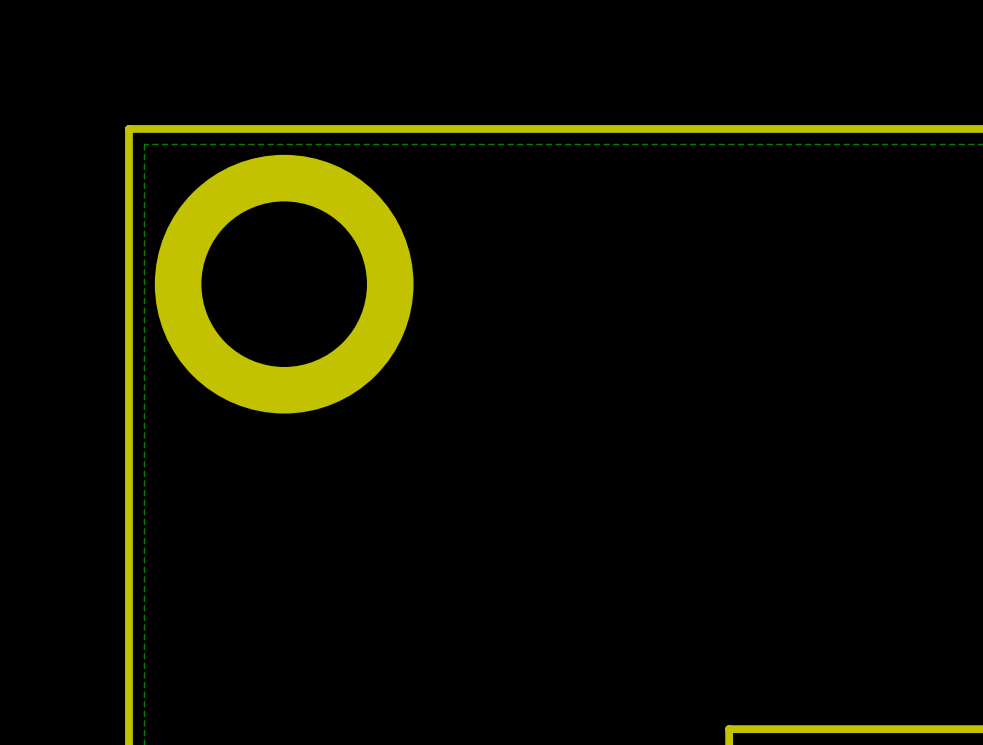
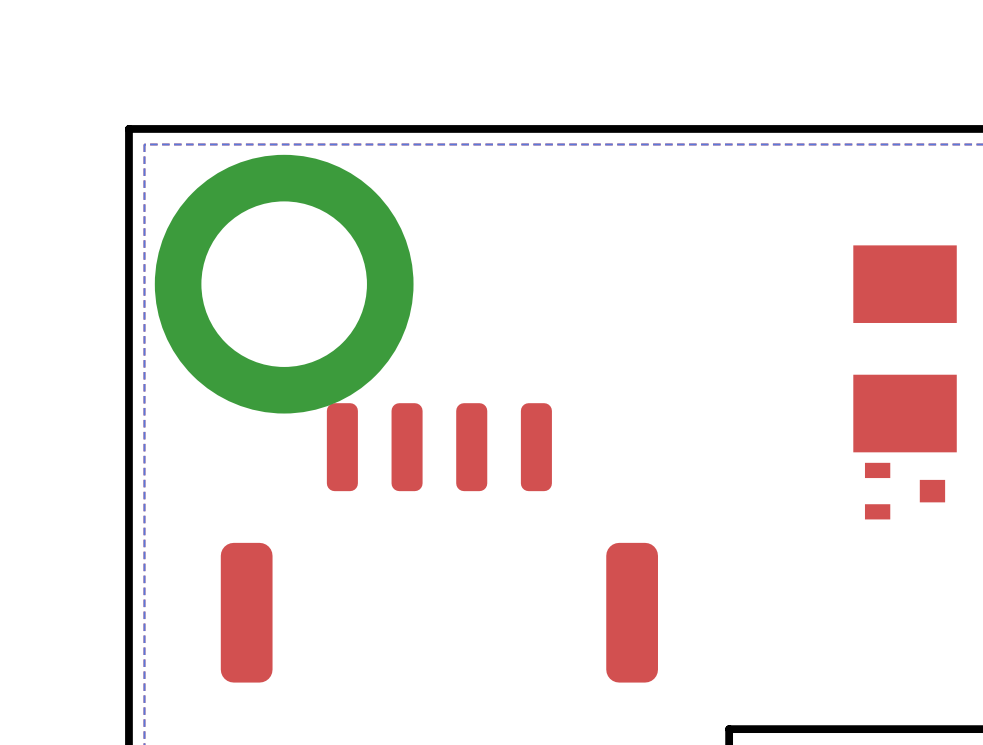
part: none -> (905, 348)
part: none -> (905, 491)
part: none -> (439, 542)

